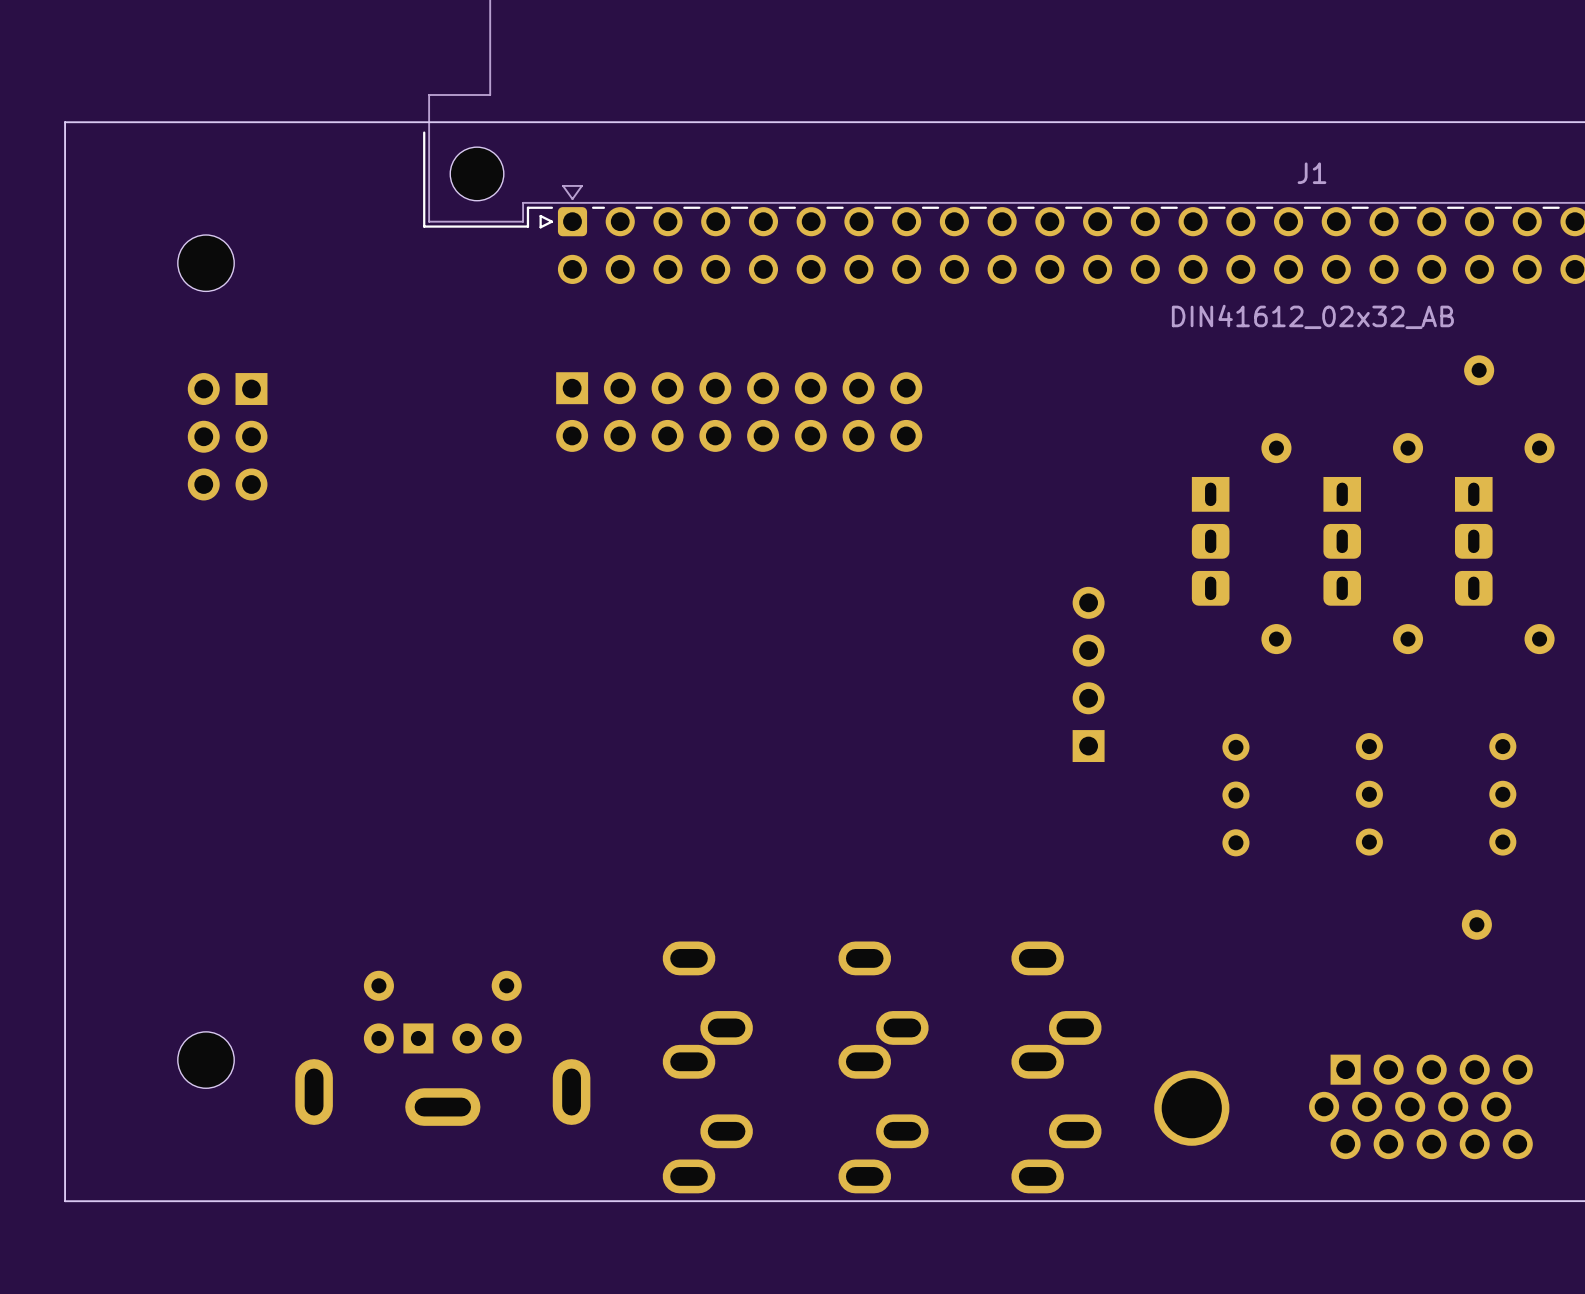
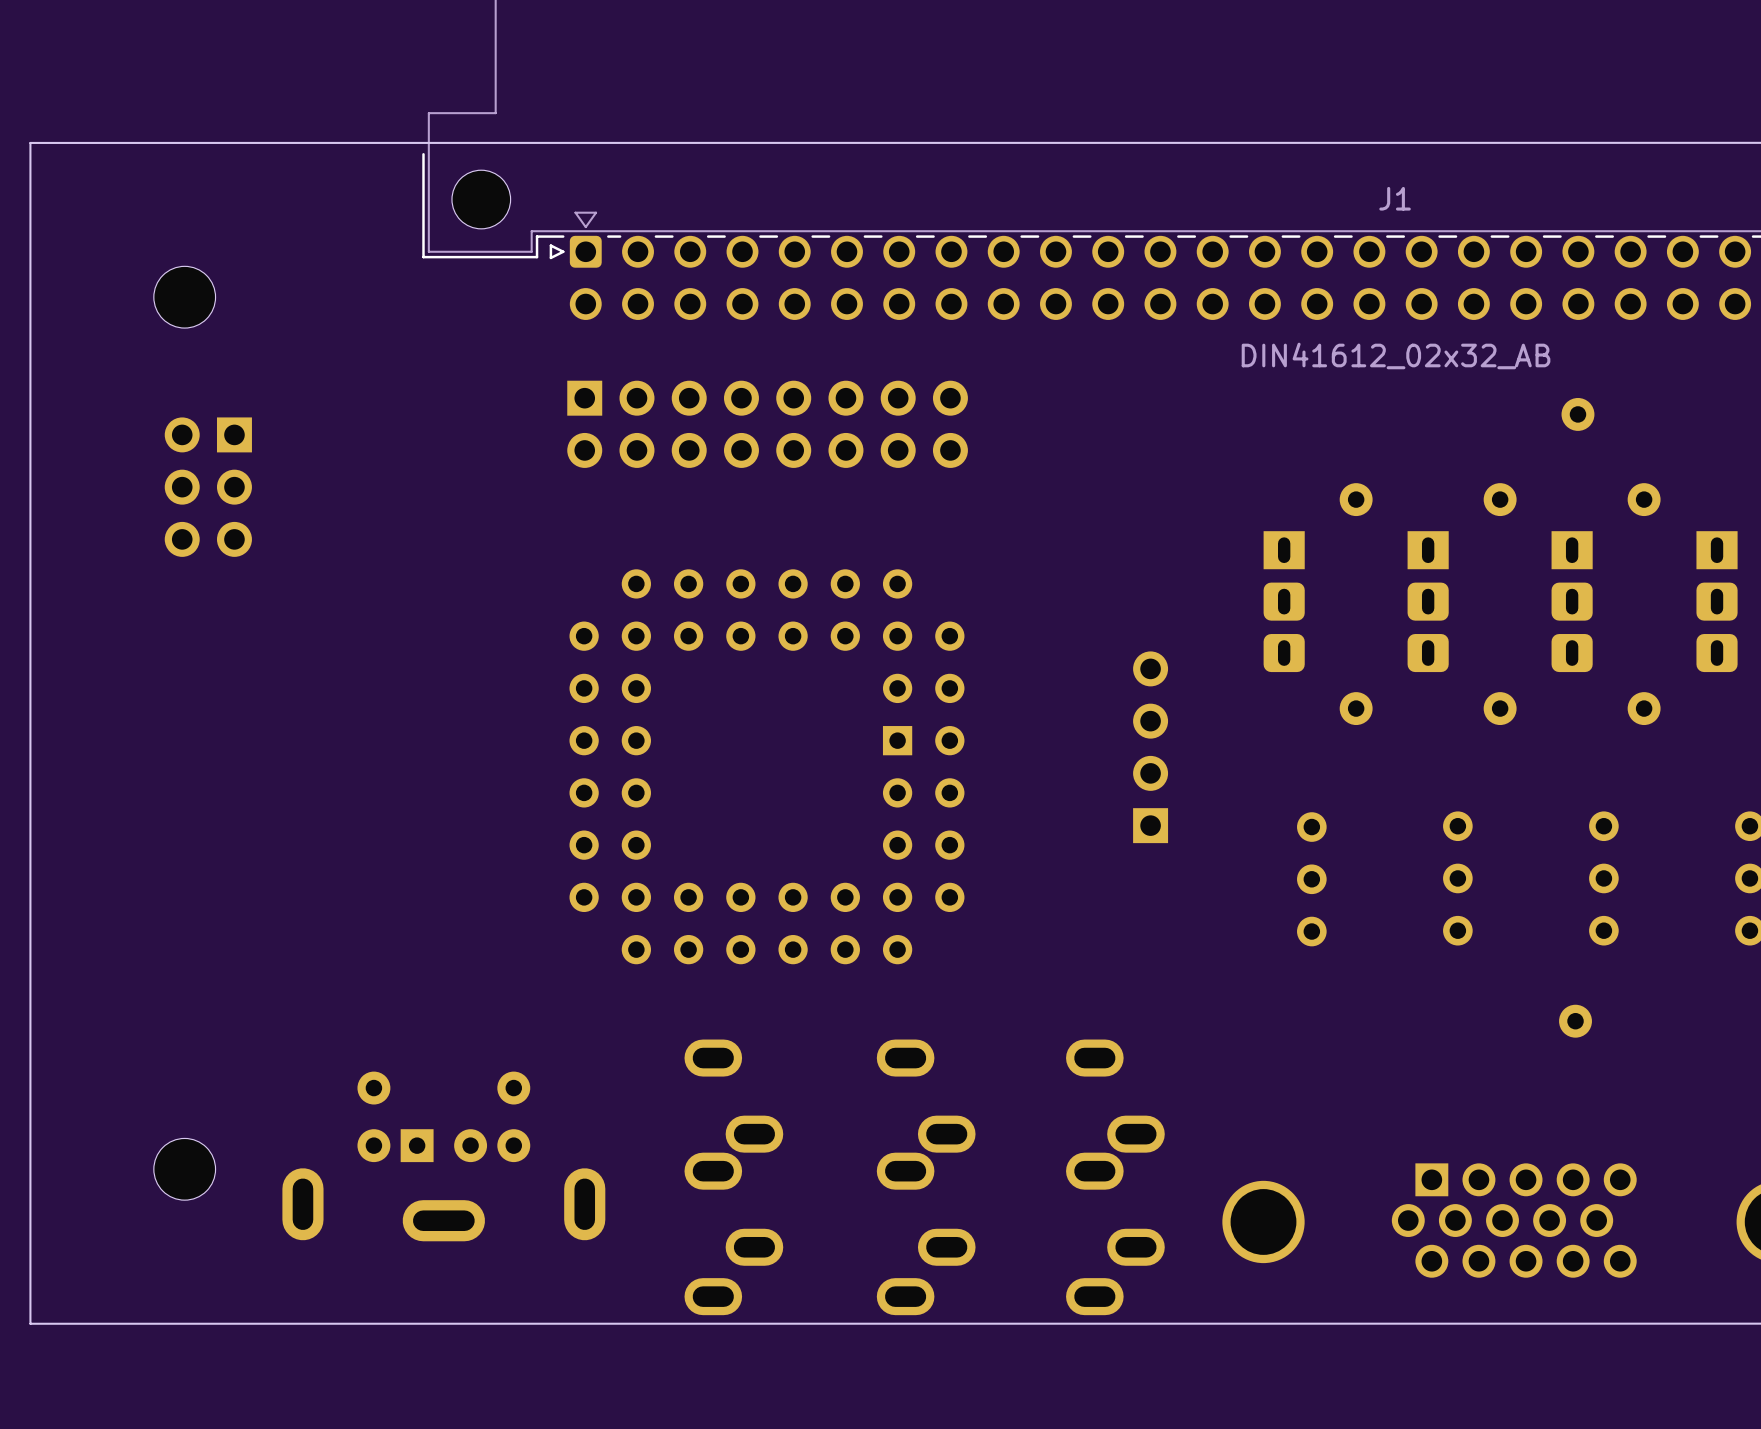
part position: (739, 412) -> (767, 424)
part: none -> (766, 766)

